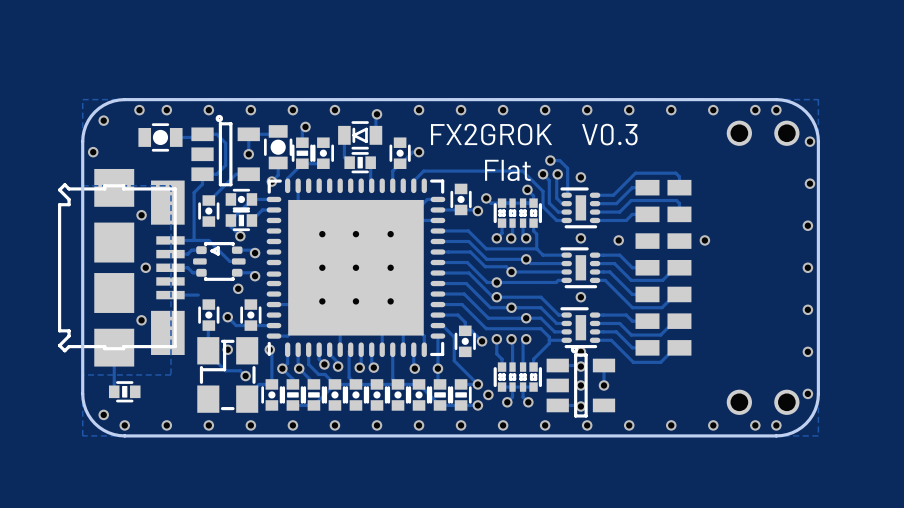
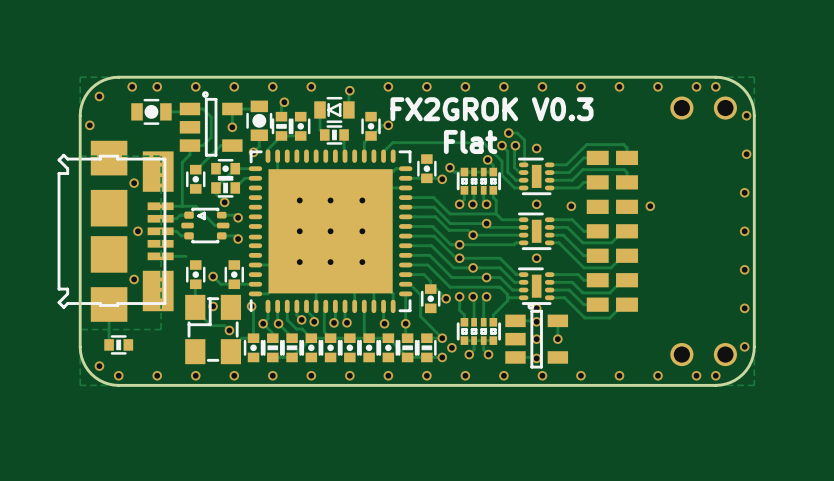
via: (238, 288) -> none

